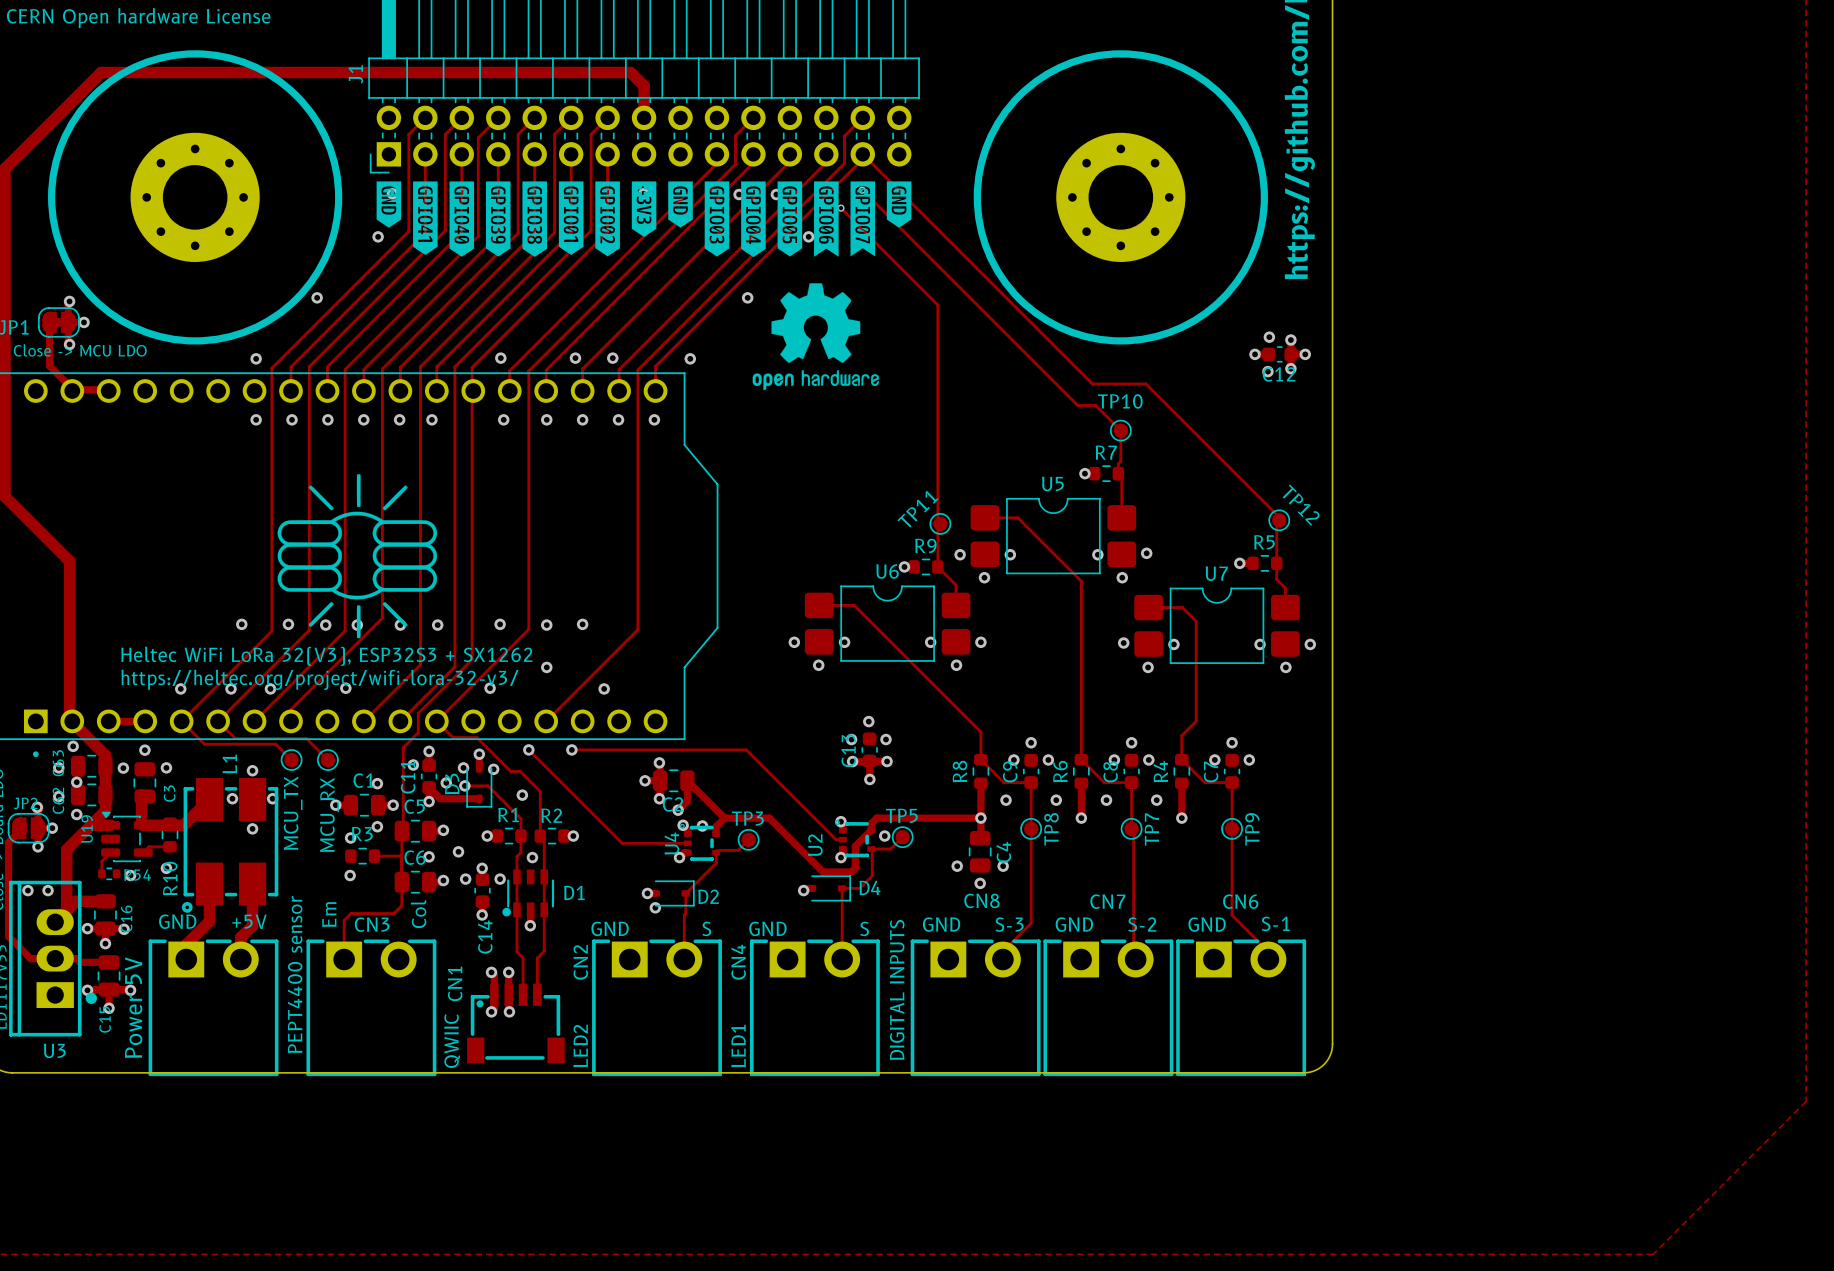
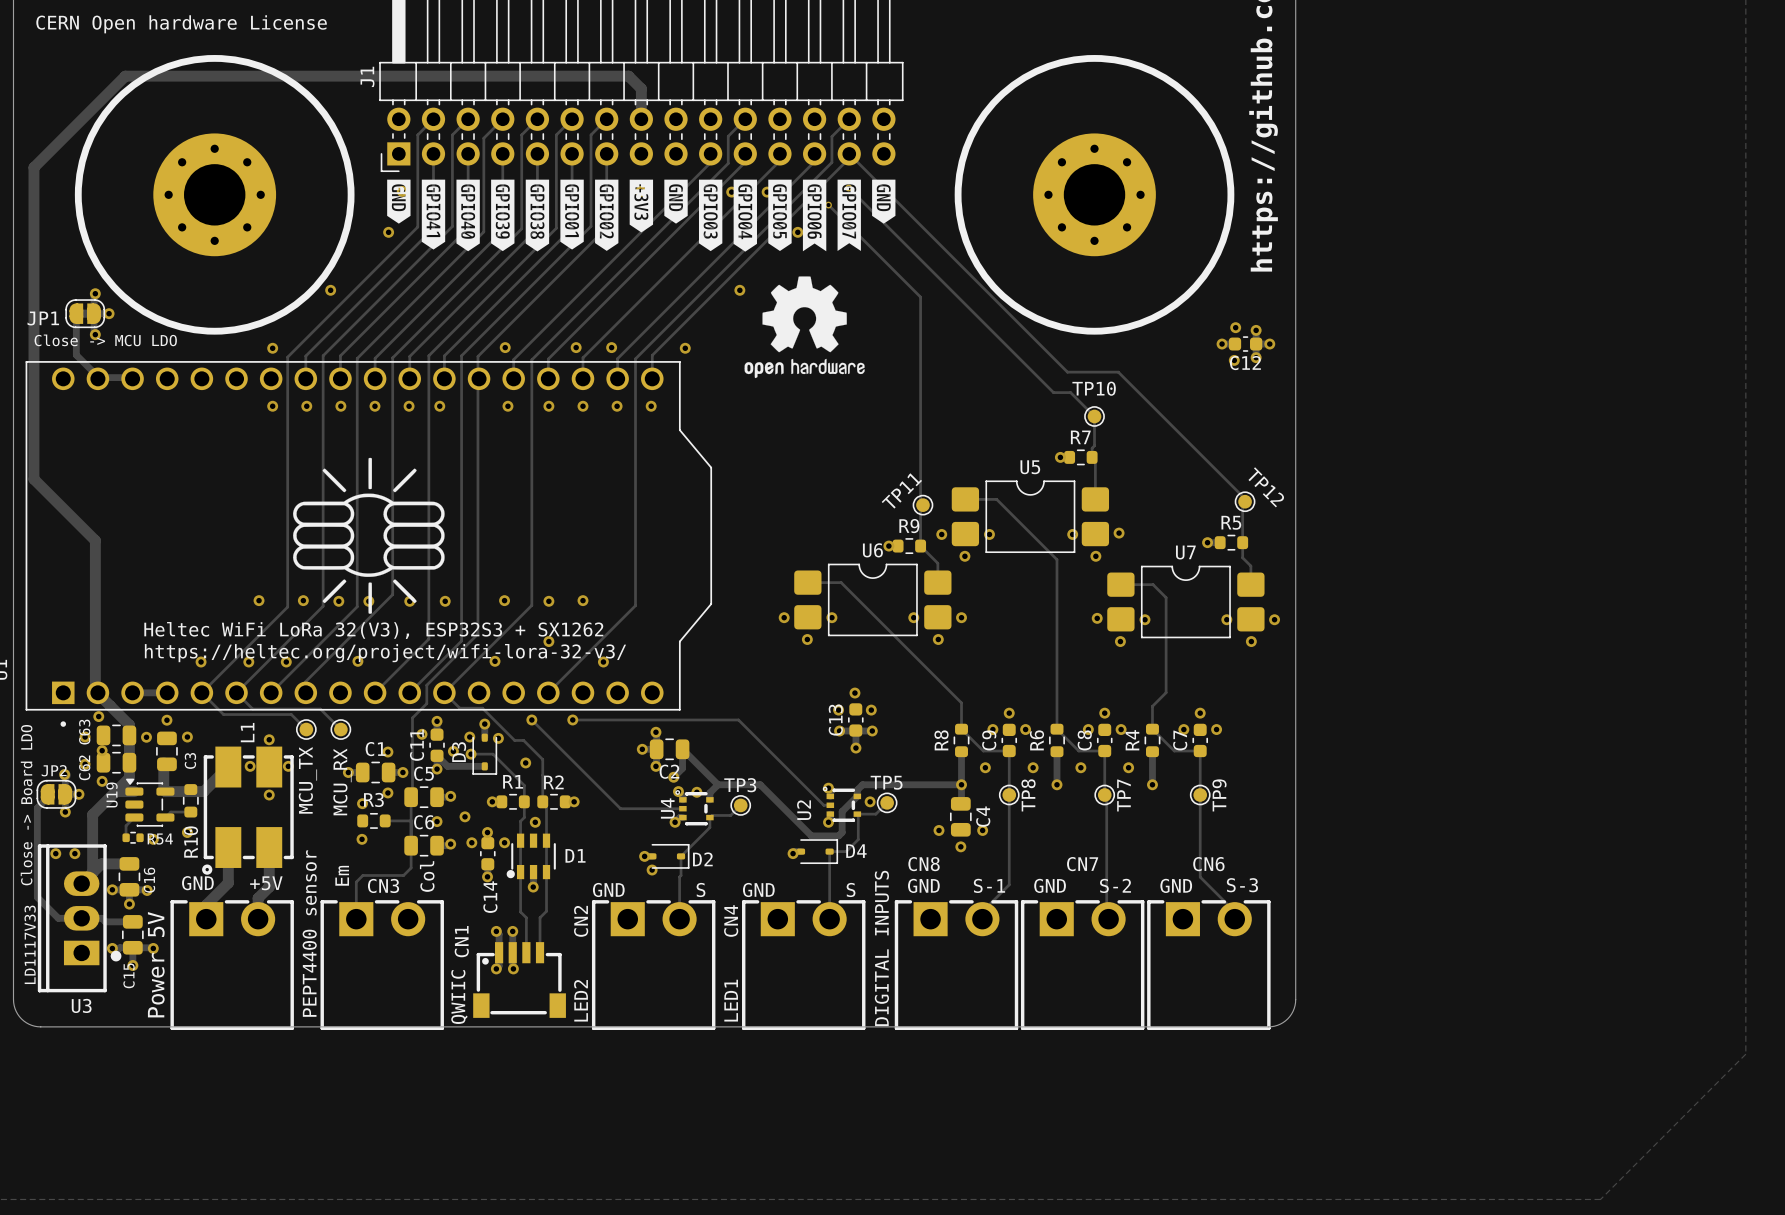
CN8 name position: CN8 (981, 900) -> CN8 (924, 864)
CN6 text: S-1 (1275, 923) -> S-3 (1242, 885)
CN8 text: S-3 (1009, 924) -> S-1 (989, 885)

